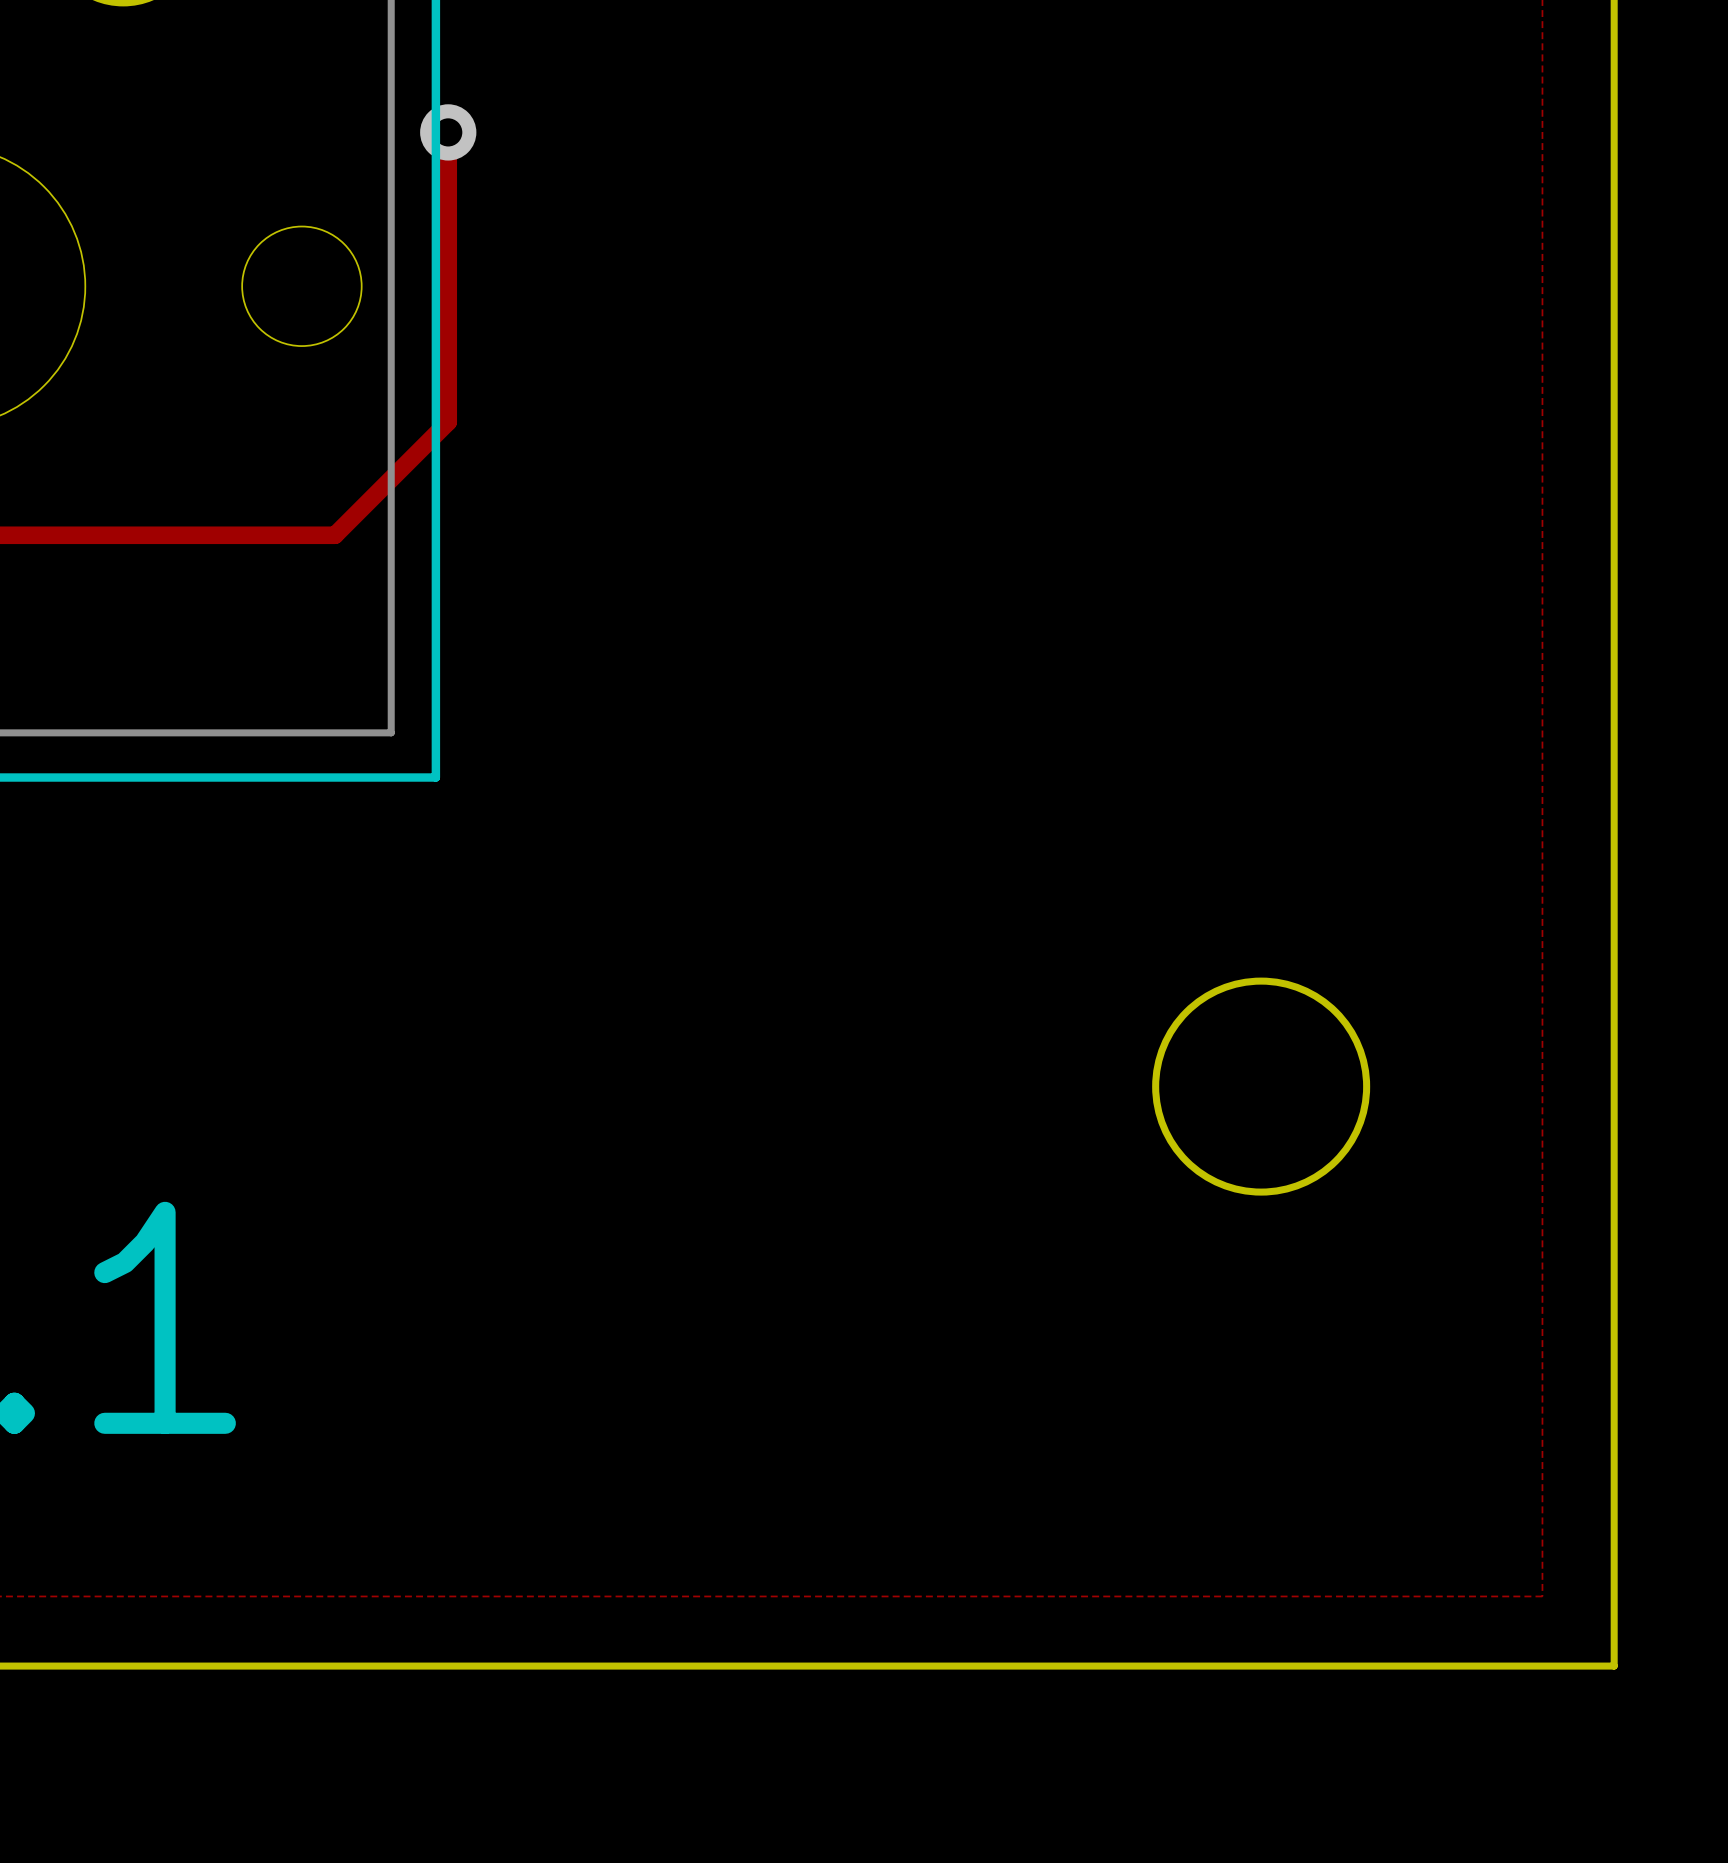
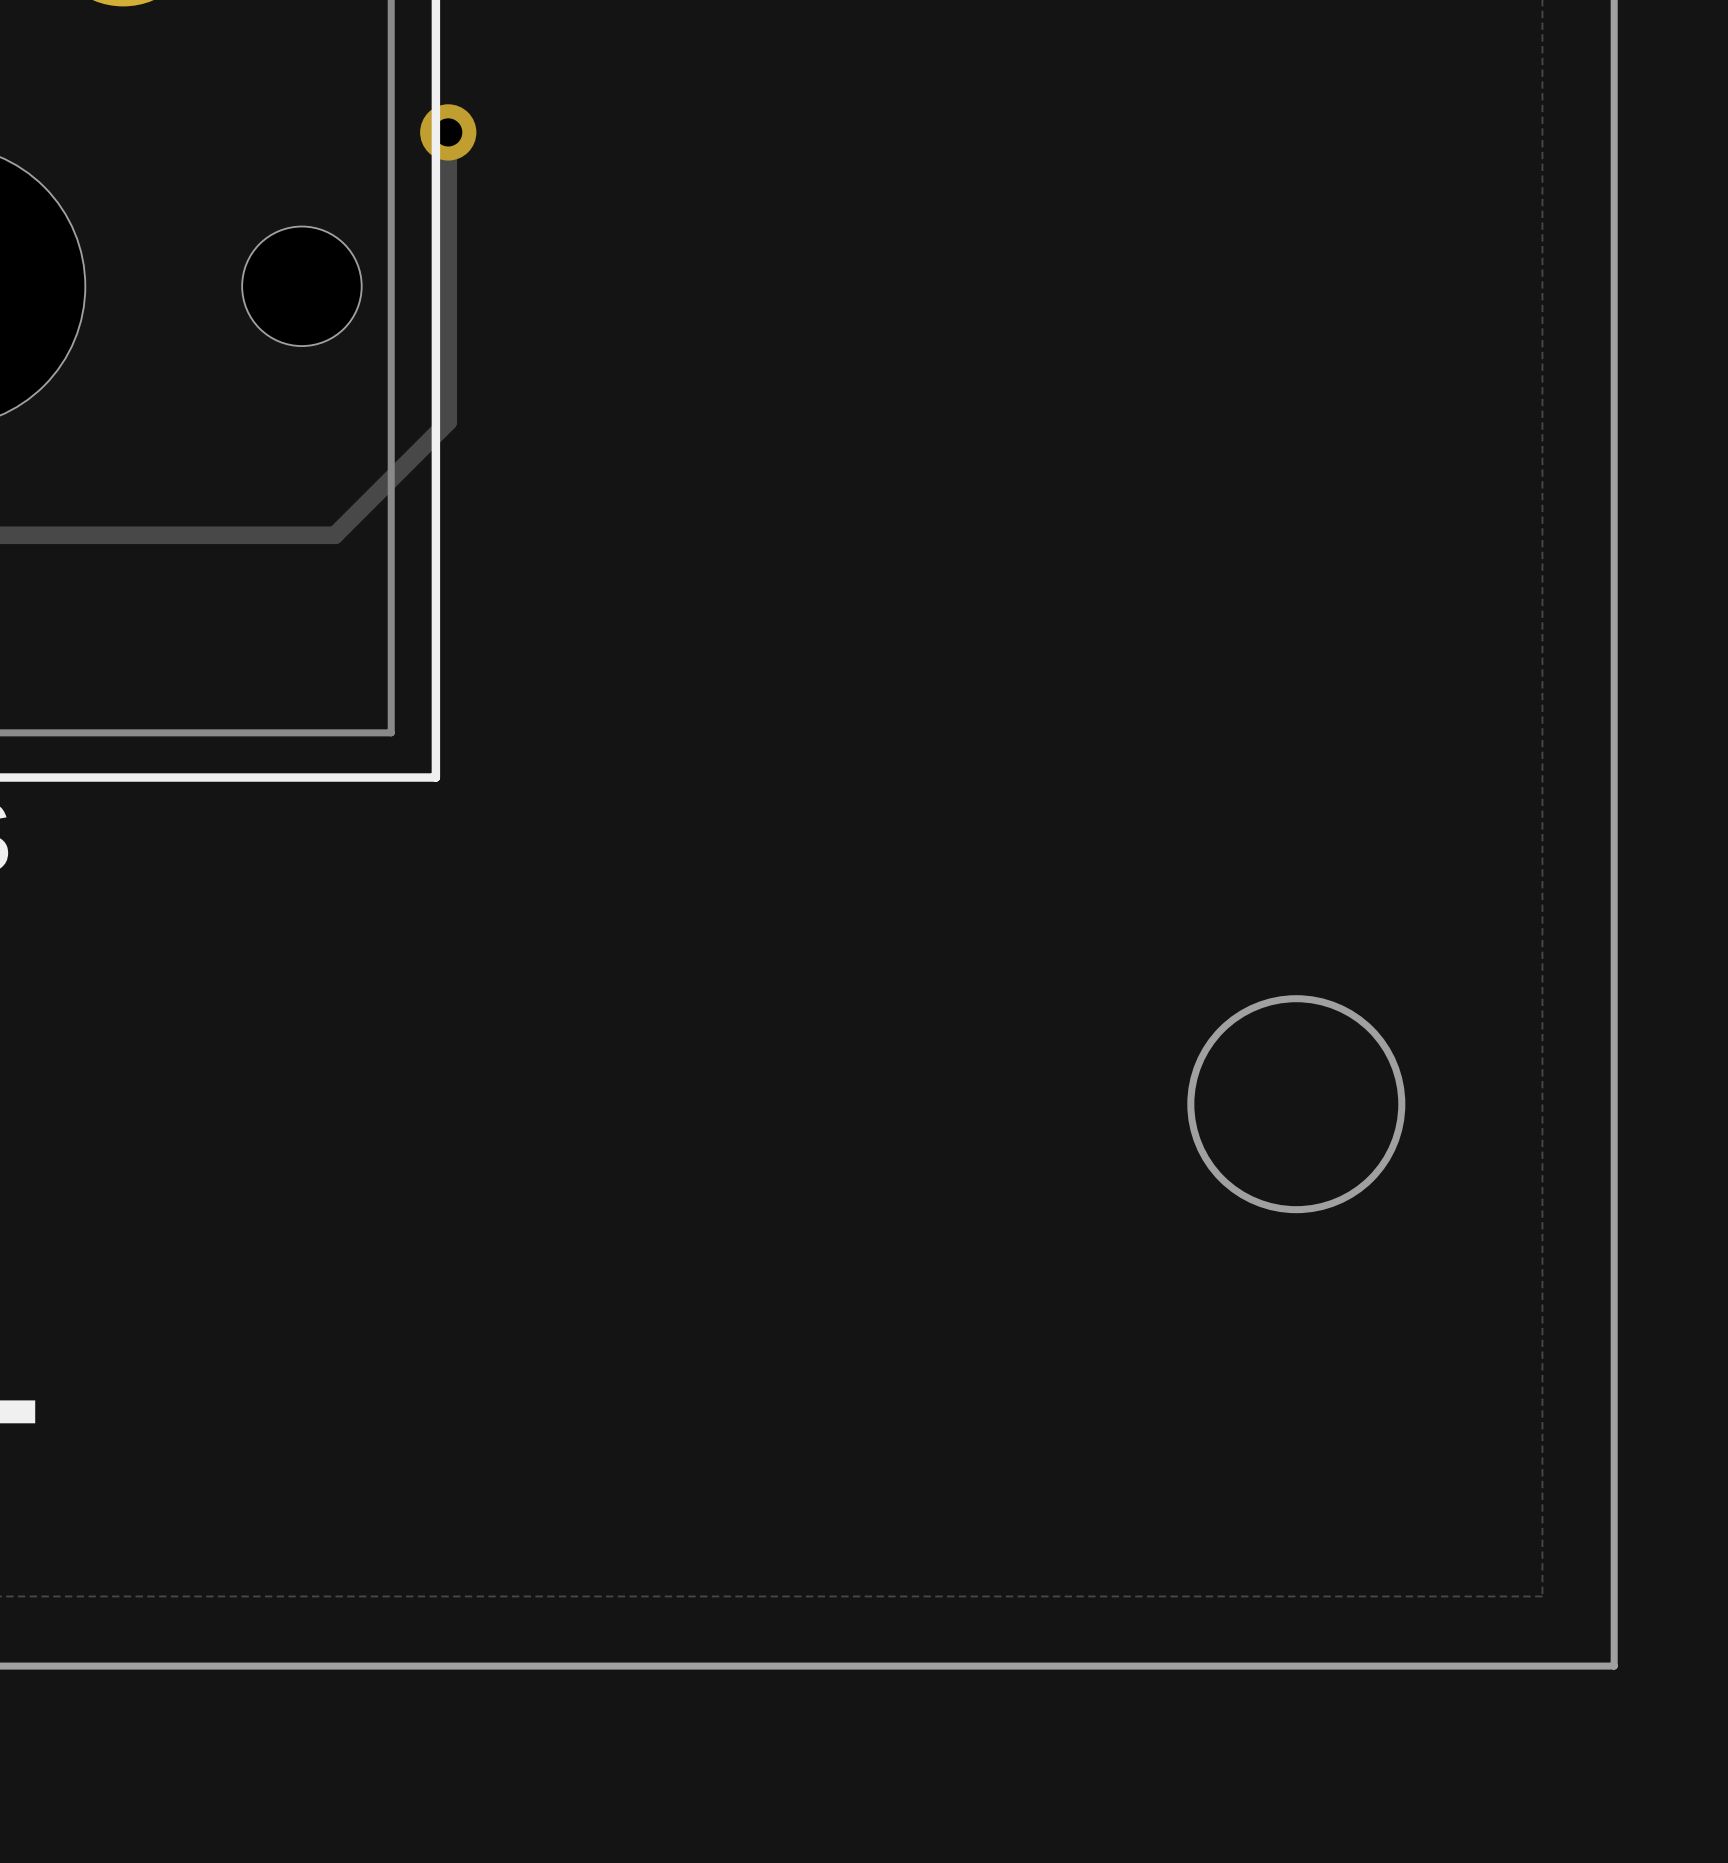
round board edge position: (1261, 1086) -> (1296, 1104)

